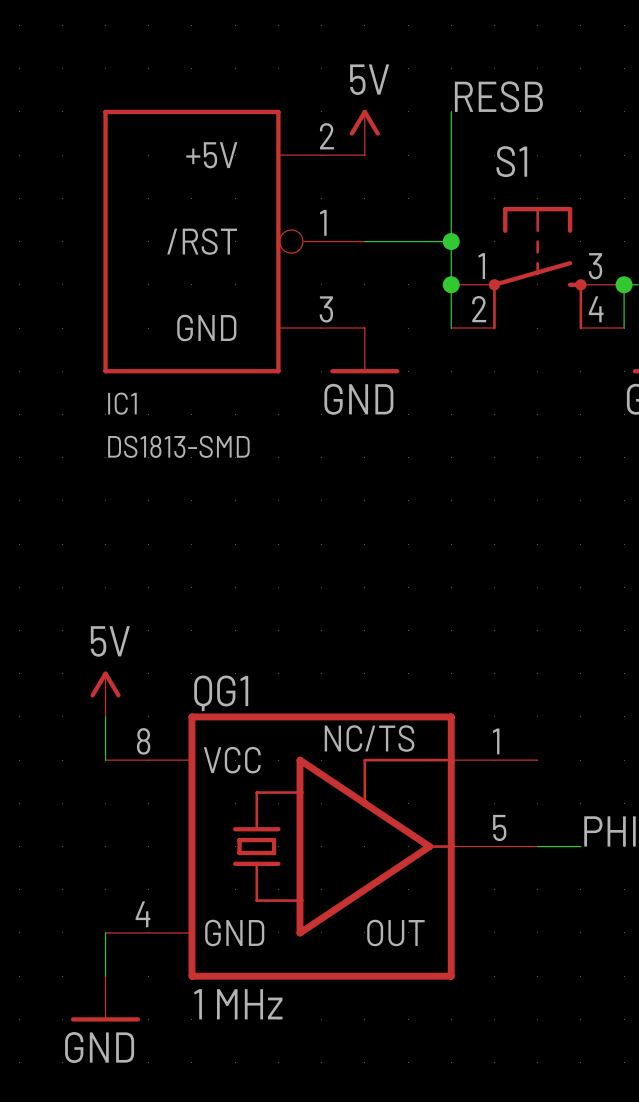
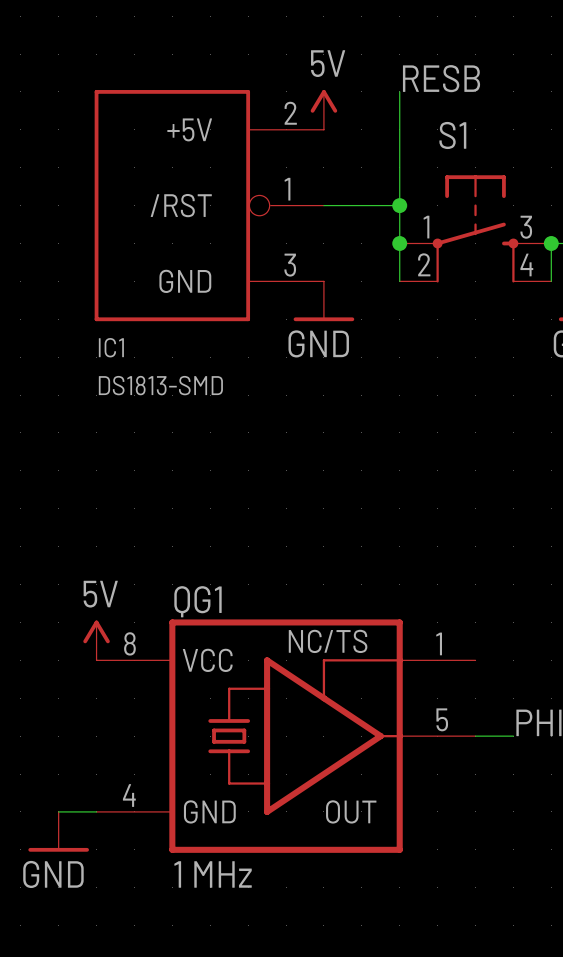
power symbol position: 5V (105, 694) -> 5V (96, 640)
wire: (105, 932) (105, 976) -> (96, 811) (58, 811)
power symbol position: GND (105, 998) -> GND (58, 831)

